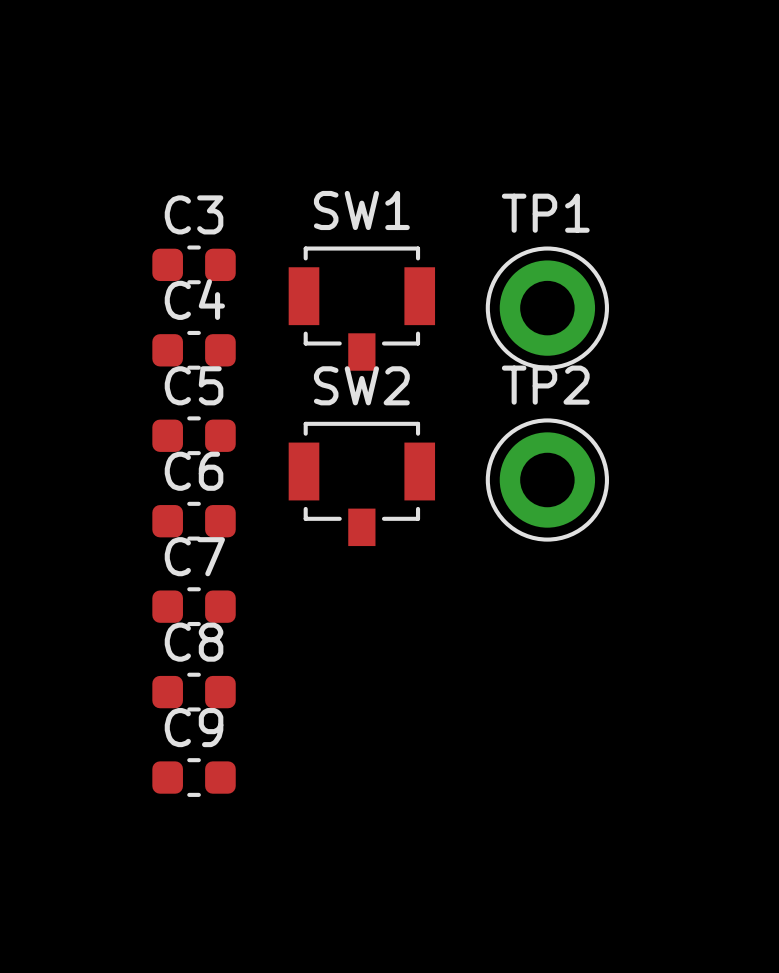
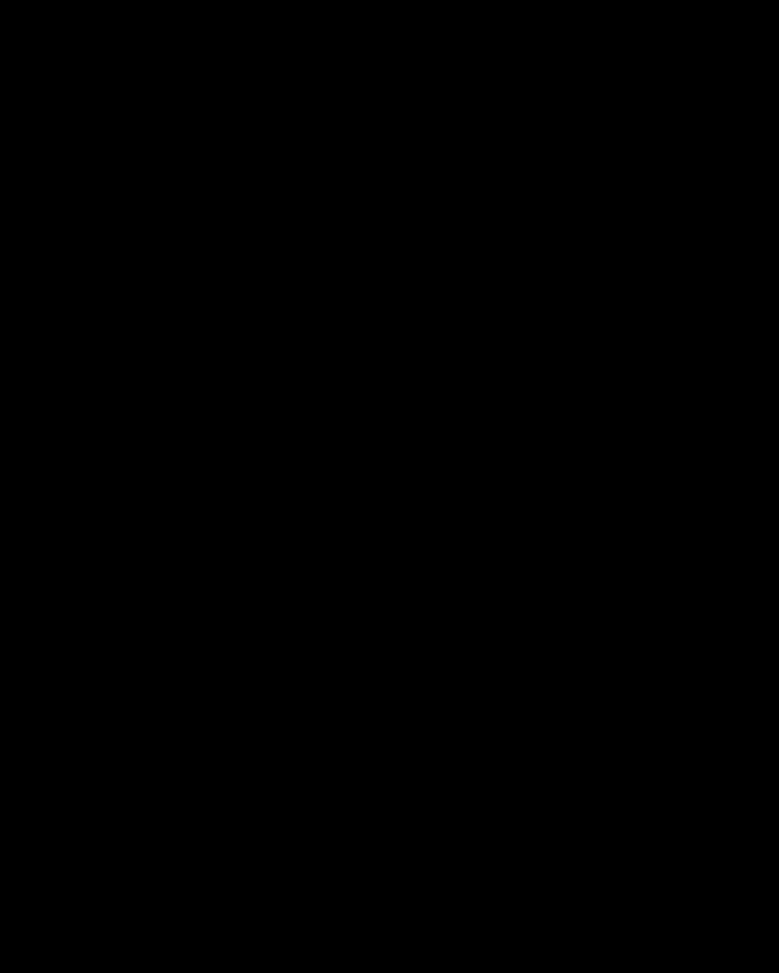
C3: (194, 264) -> none
SW1: (361, 308) -> none
TP1: (547, 308) -> none
C4: (194, 350) -> none
C5: (194, 435) -> none
TP2: (547, 480) -> none
SW2: (361, 483) -> none
C6: (194, 521) -> none
C7: (194, 606) -> none
C8: (194, 692) -> none
C9: (194, 777) -> none

